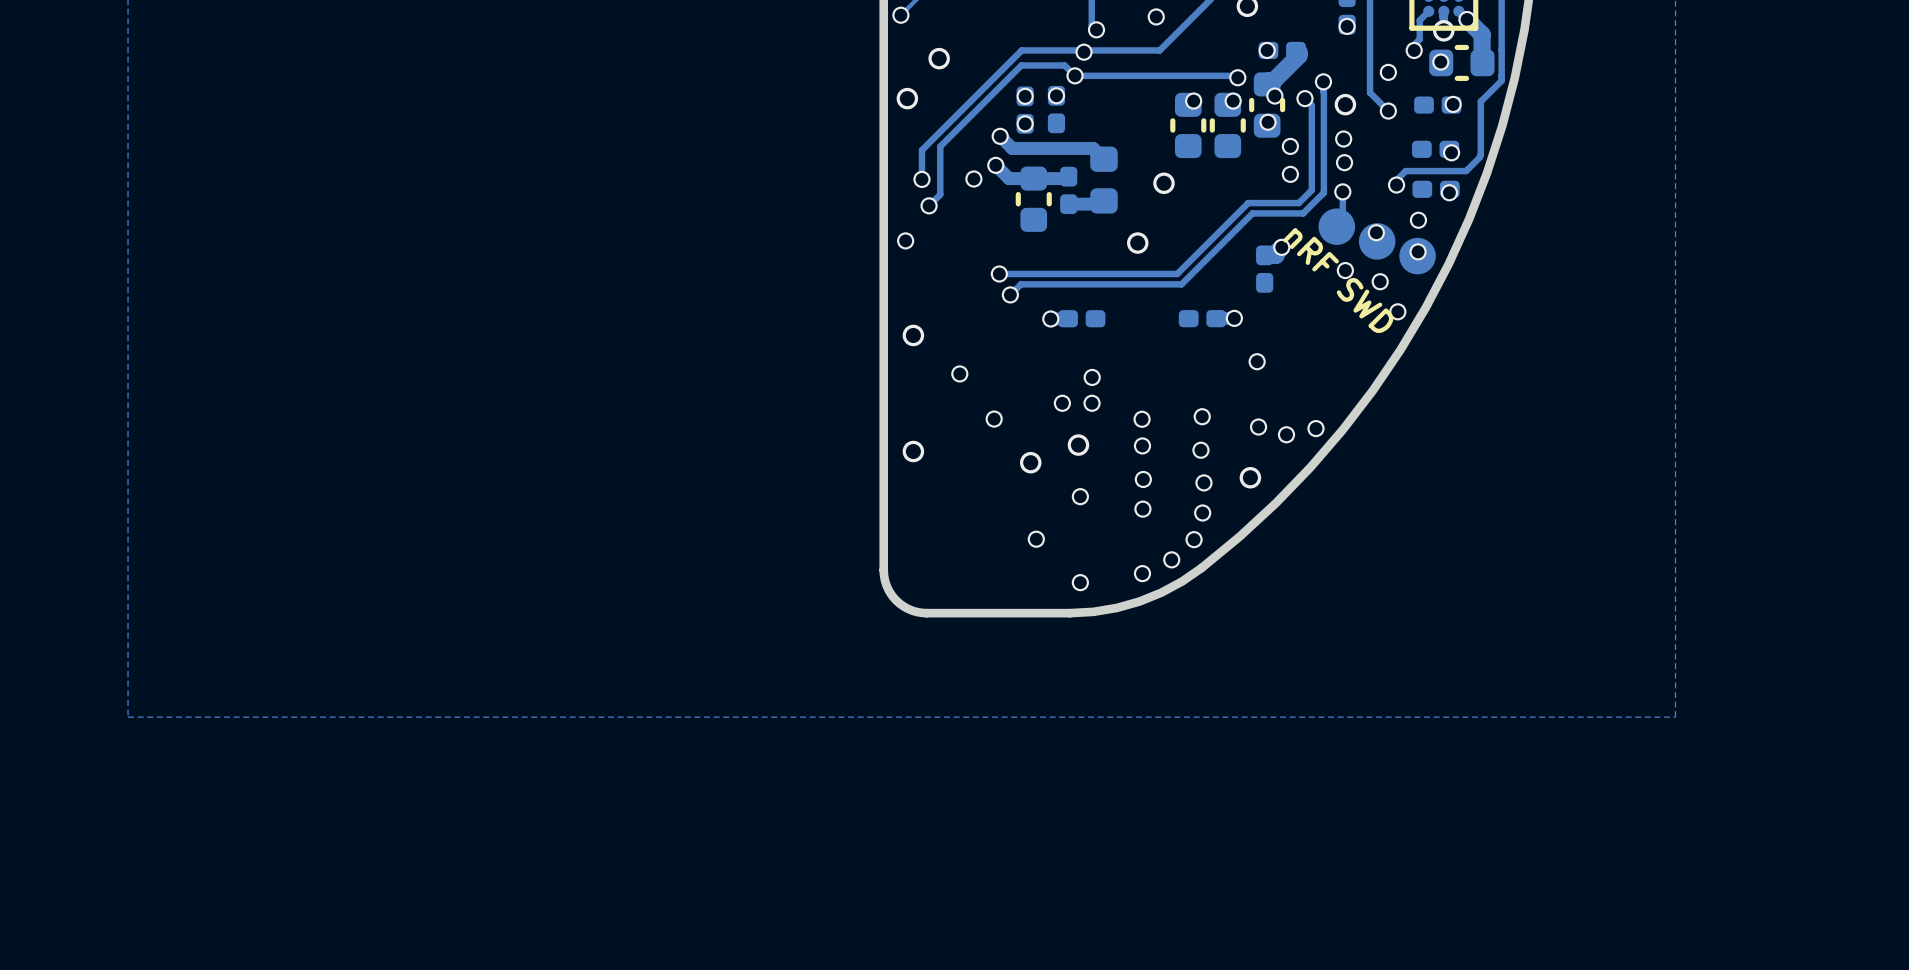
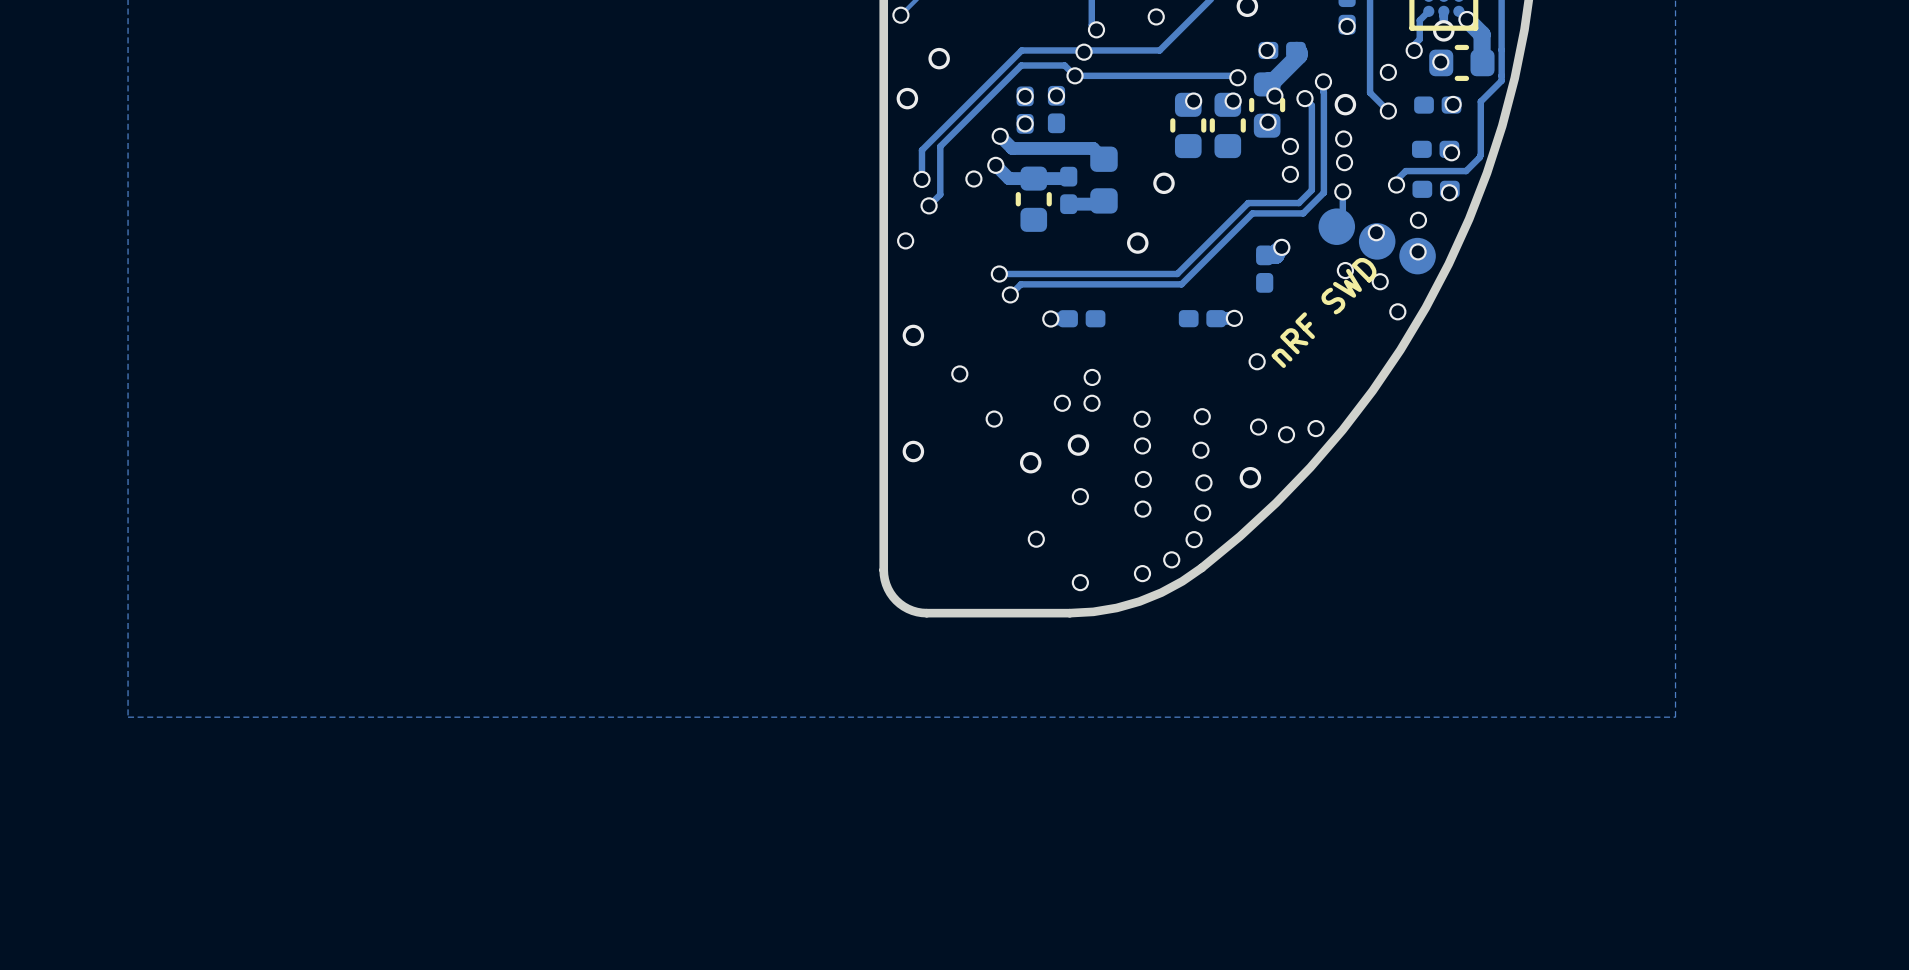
text rotation: 0° (1338, 280) -> 90° counterclockwise (1323, 312)

